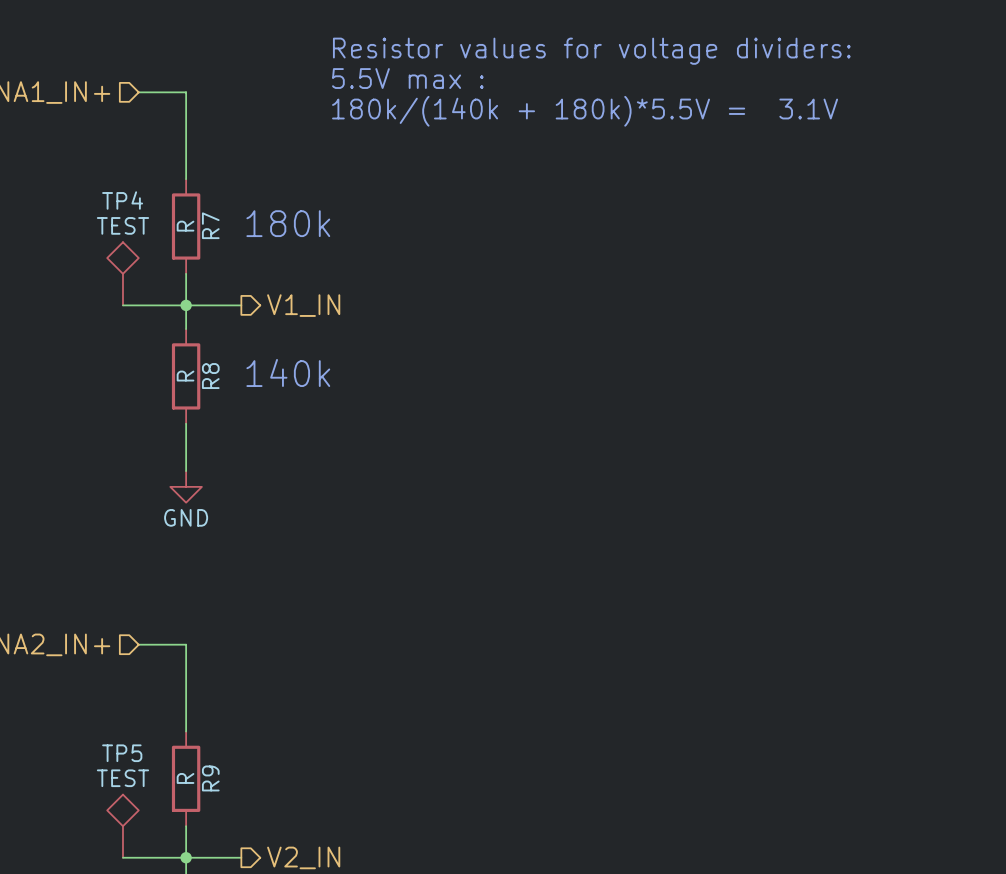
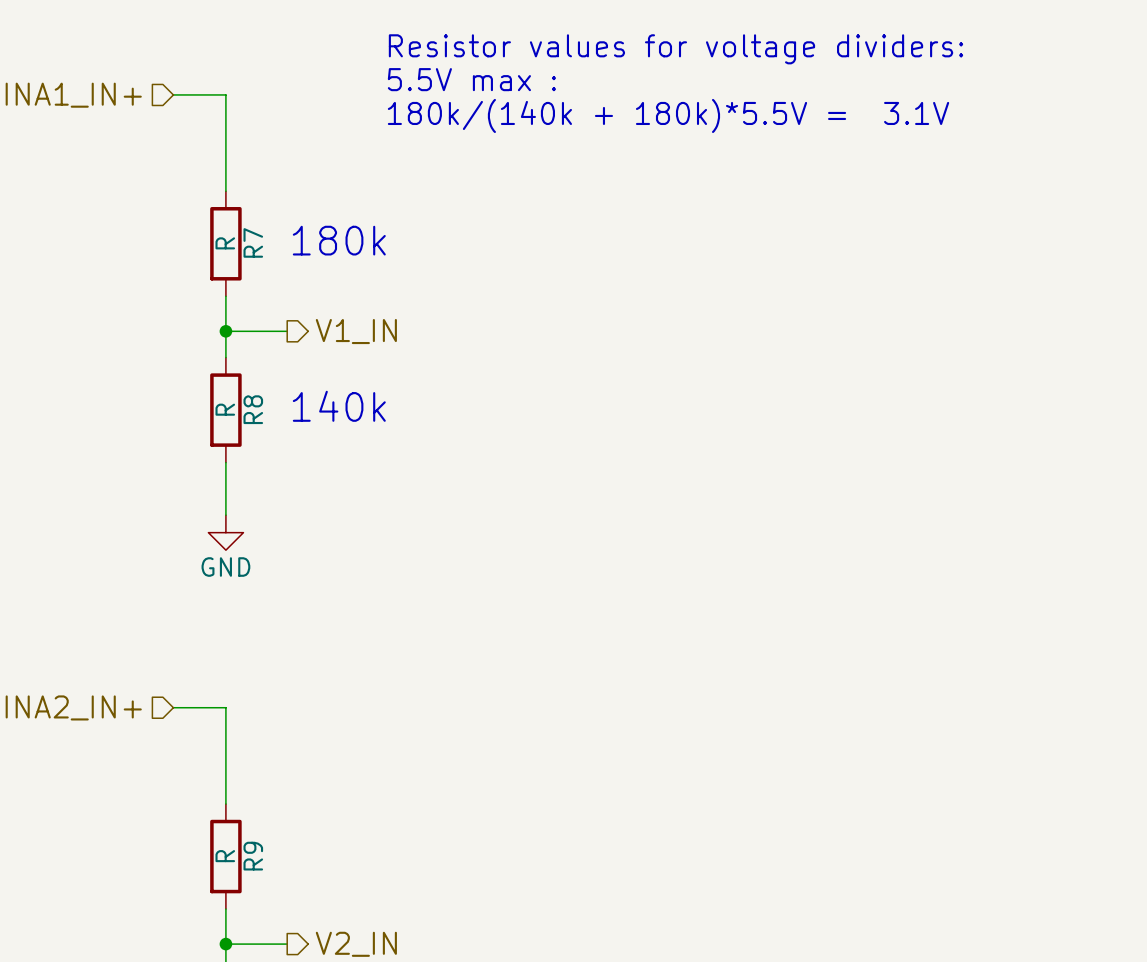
TP4: TEST (122, 273) -> none
wire: (122, 305) (186, 305) -> none
TP5: TEST (122, 826) -> none
wire: (122, 857) (186, 857) -> none

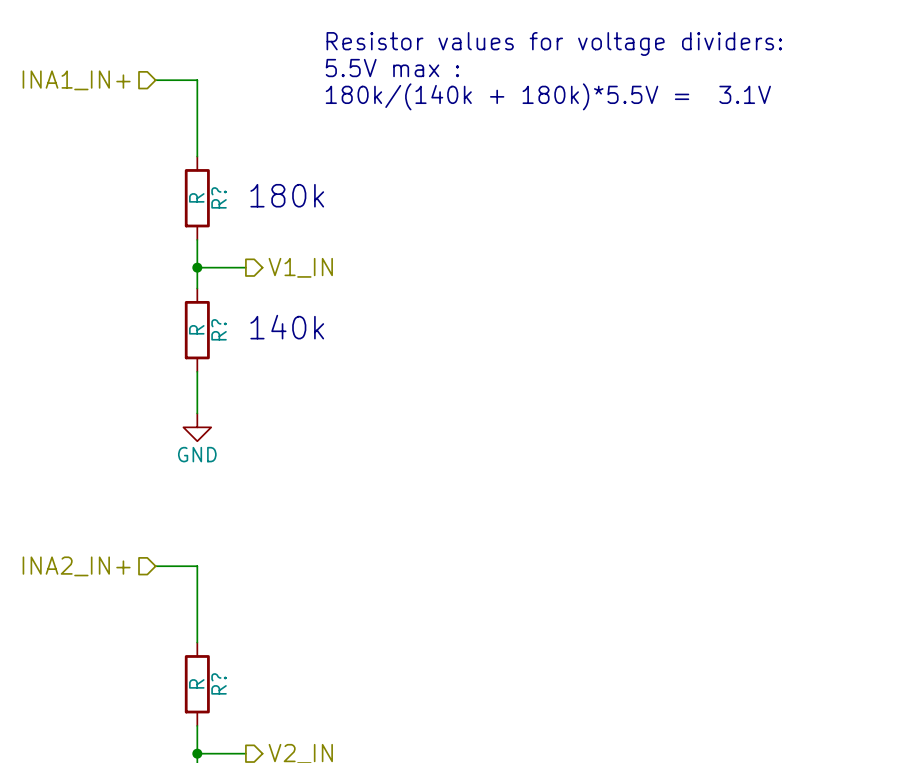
R7 name: R7 (253, 242) -> R? (219, 197)
R8 name: R8 (253, 409) -> R? (219, 329)
R9 name: R9 (253, 856) -> R? (219, 683)

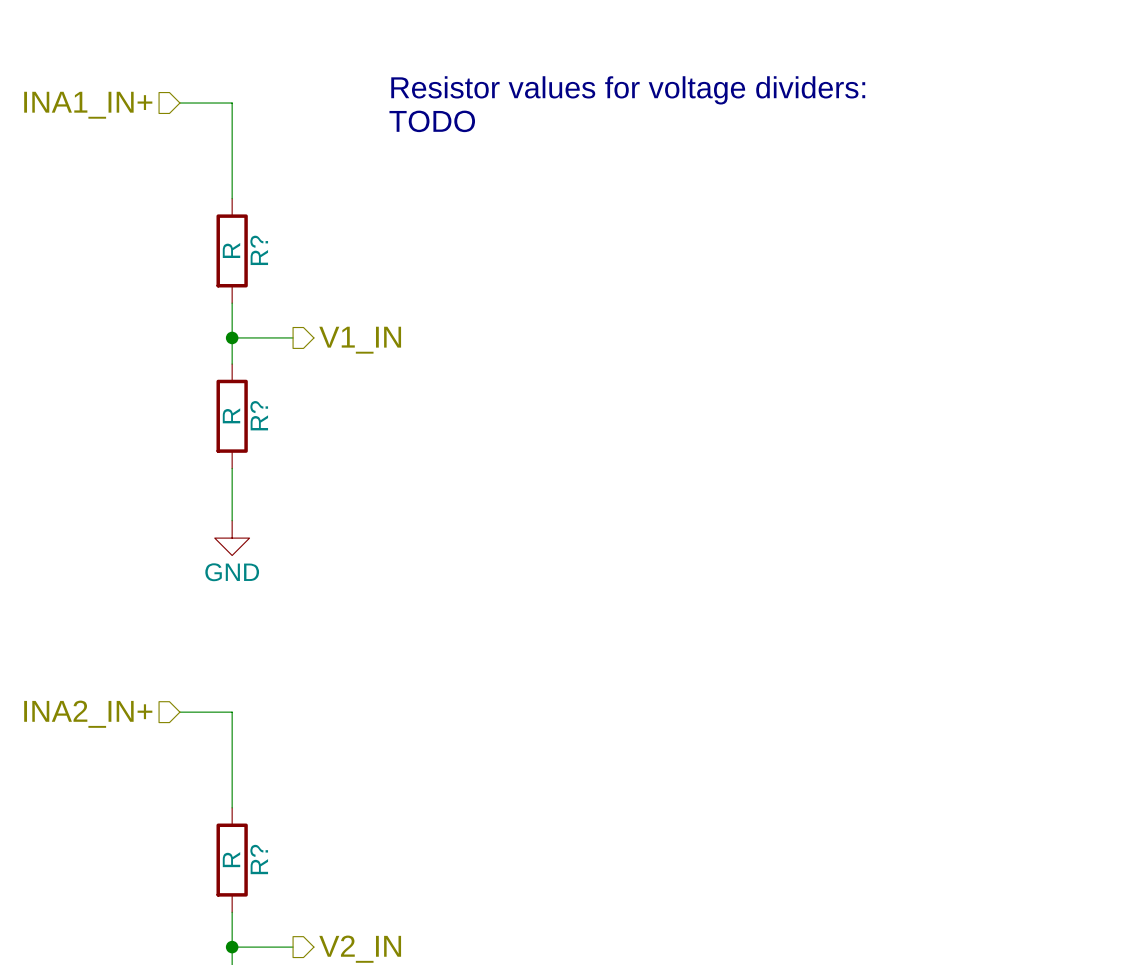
text: Resistor values for voltage dividers: (554, 43) -> none
text: 5.5V max : (392, 68) -> Resistor values for voltage dividers: (628, 90)
text: 180k/(140k + 180k)*5.5V = 3.1V (548, 96) -> TODO (432, 121)
text: 180k (287, 195) -> none
text: 140k (287, 327) -> none

